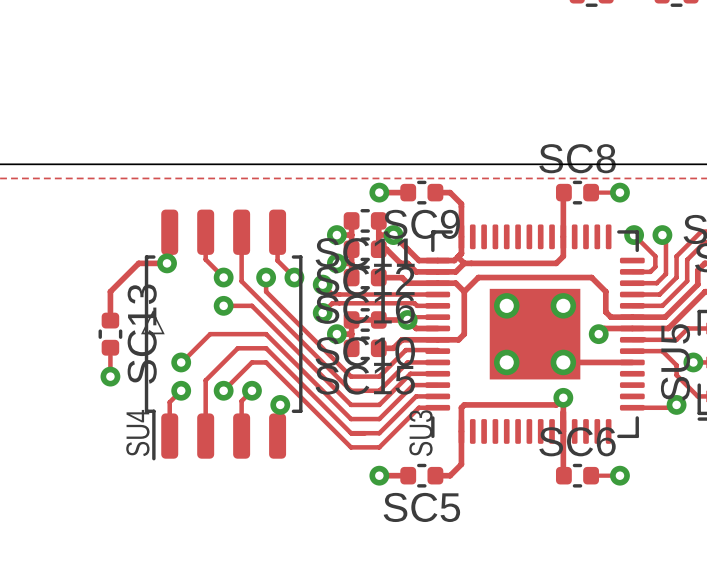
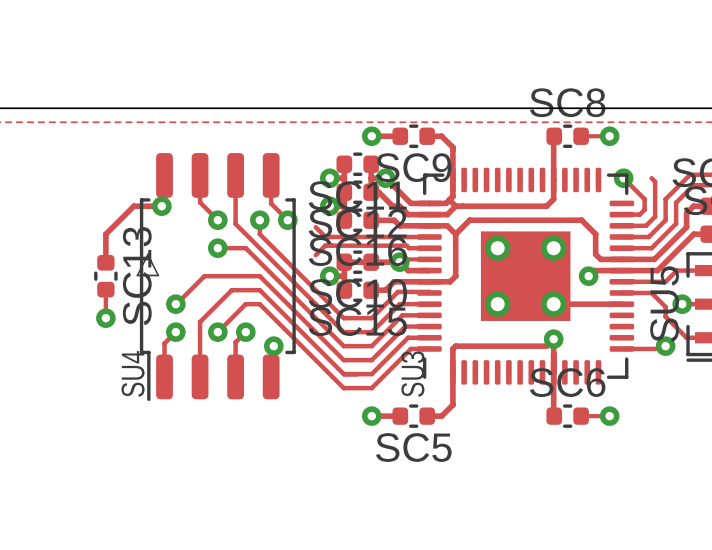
via: (662, 235) -> none
via: (322, 284) -> none
via: (322, 312) -> none

